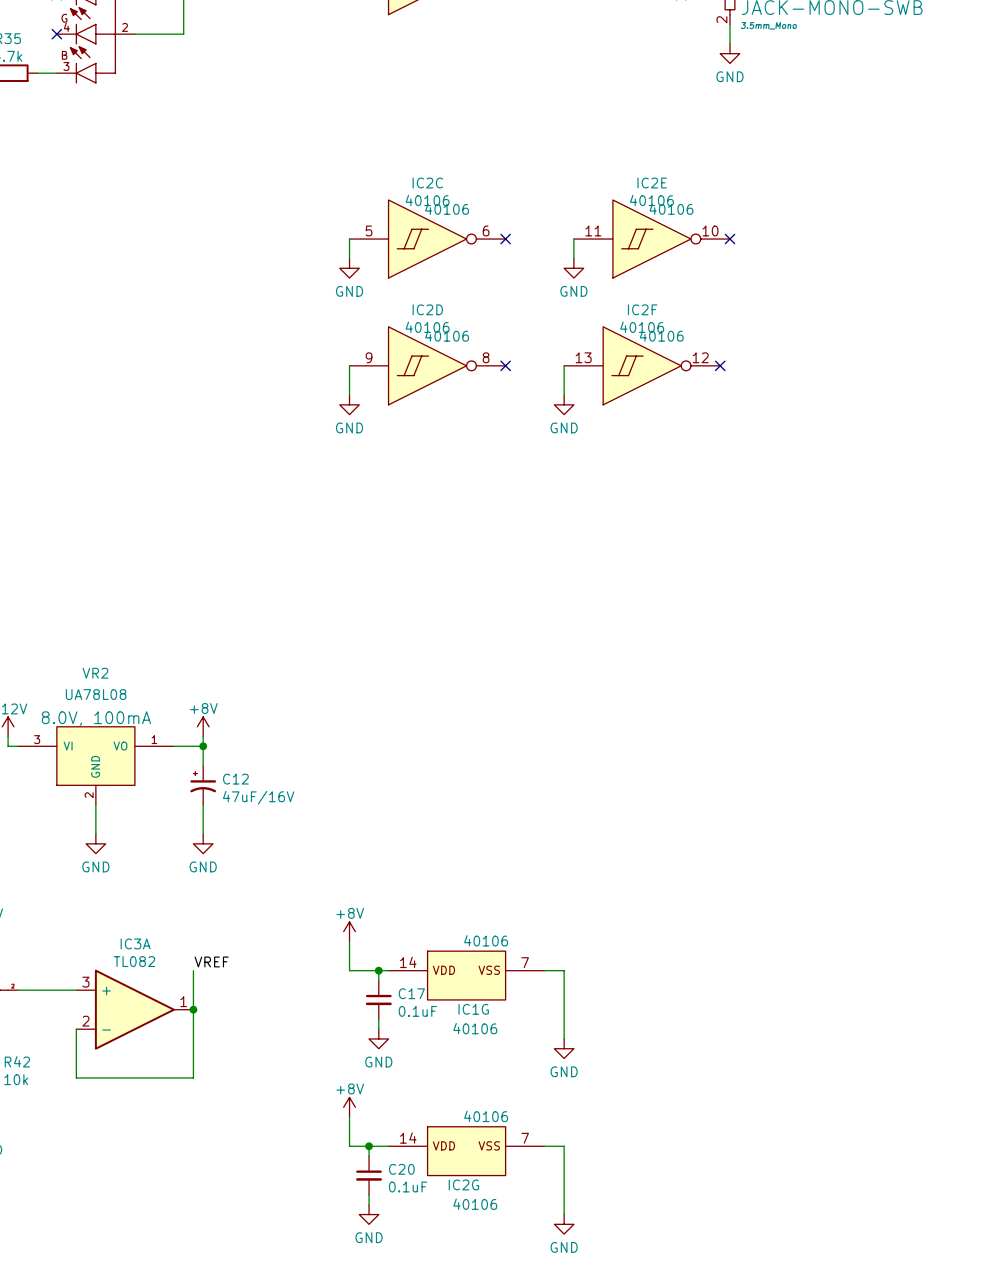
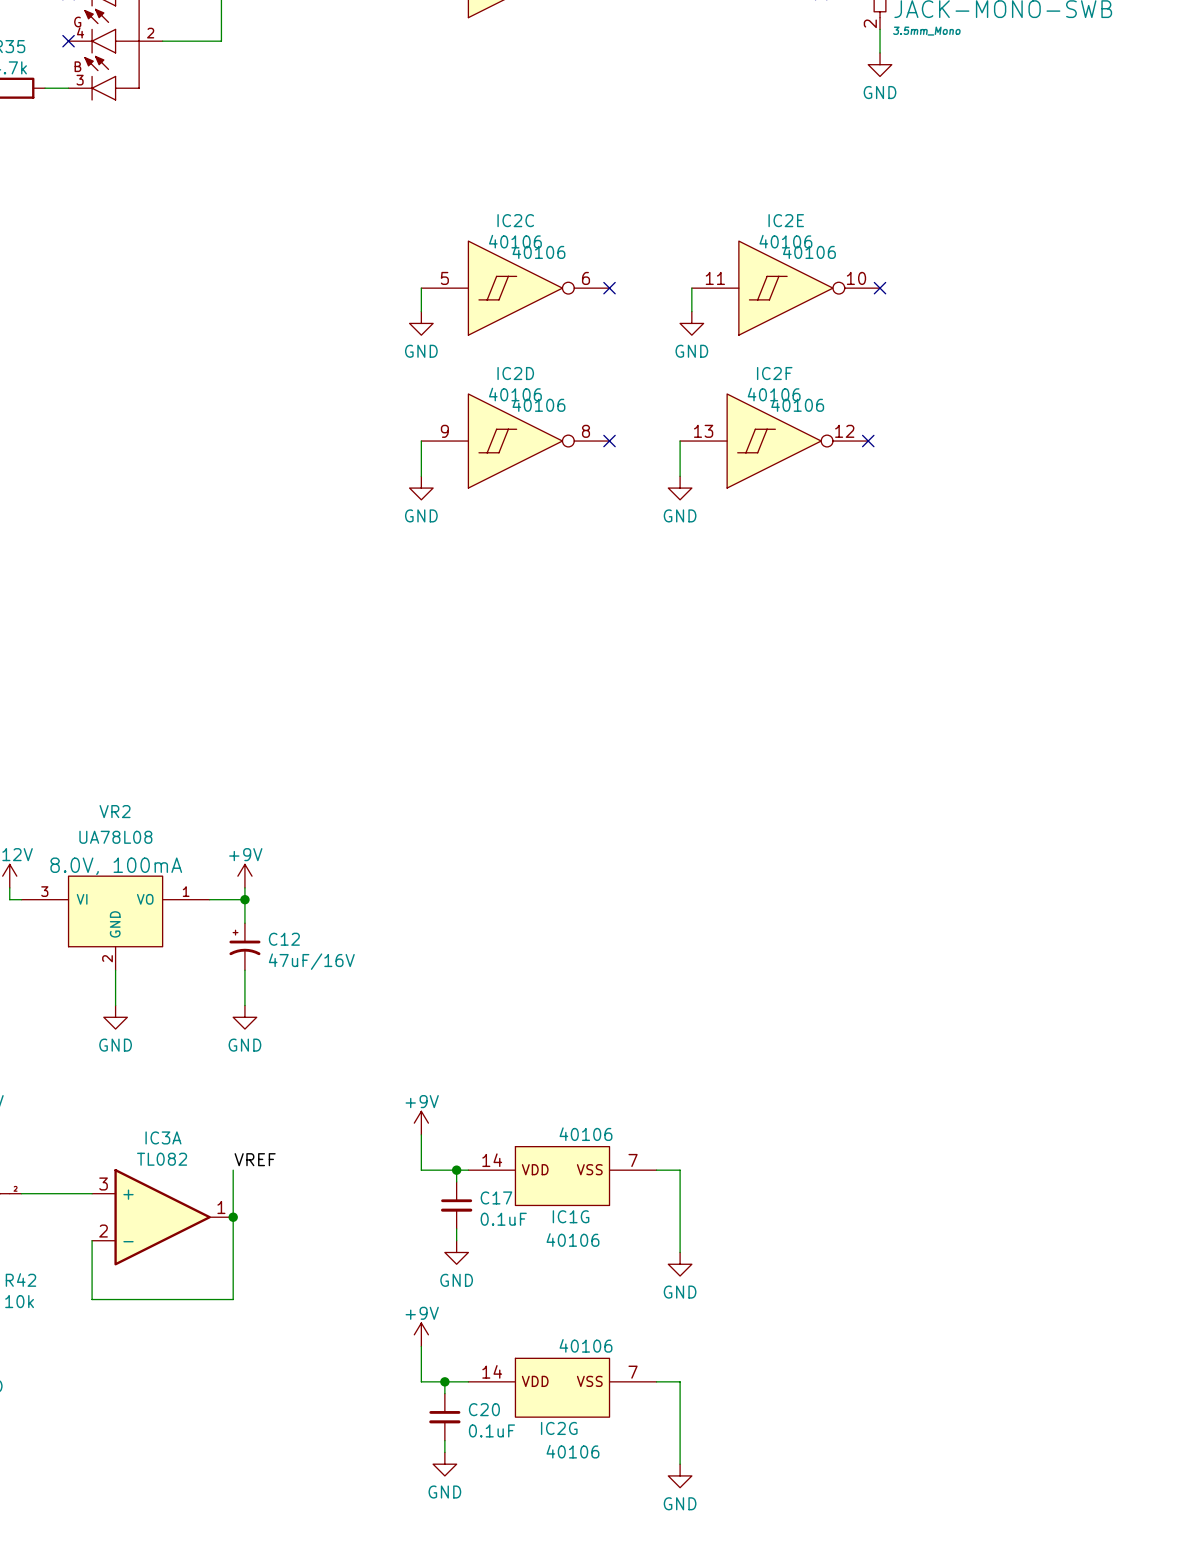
power symbol: +8V (203, 726) -> +9V (244, 876)
power symbol: +8V (349, 931) -> +9V (421, 1123)
power symbol: +8V (349, 1107) -> +9V (421, 1334)

